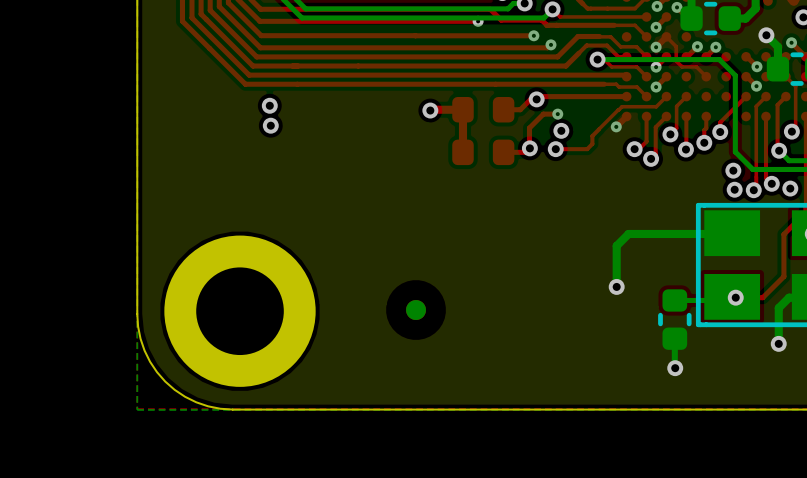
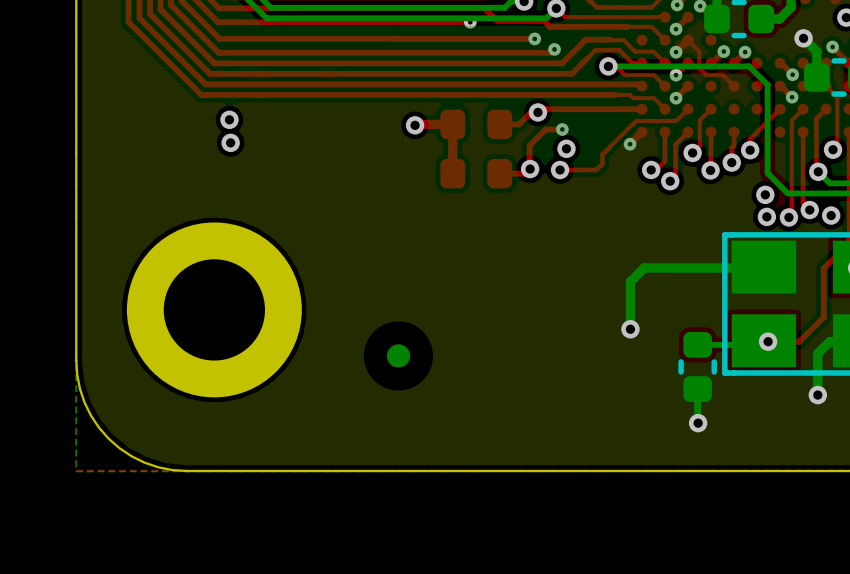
part position: (240, 311) -> (214, 309)

